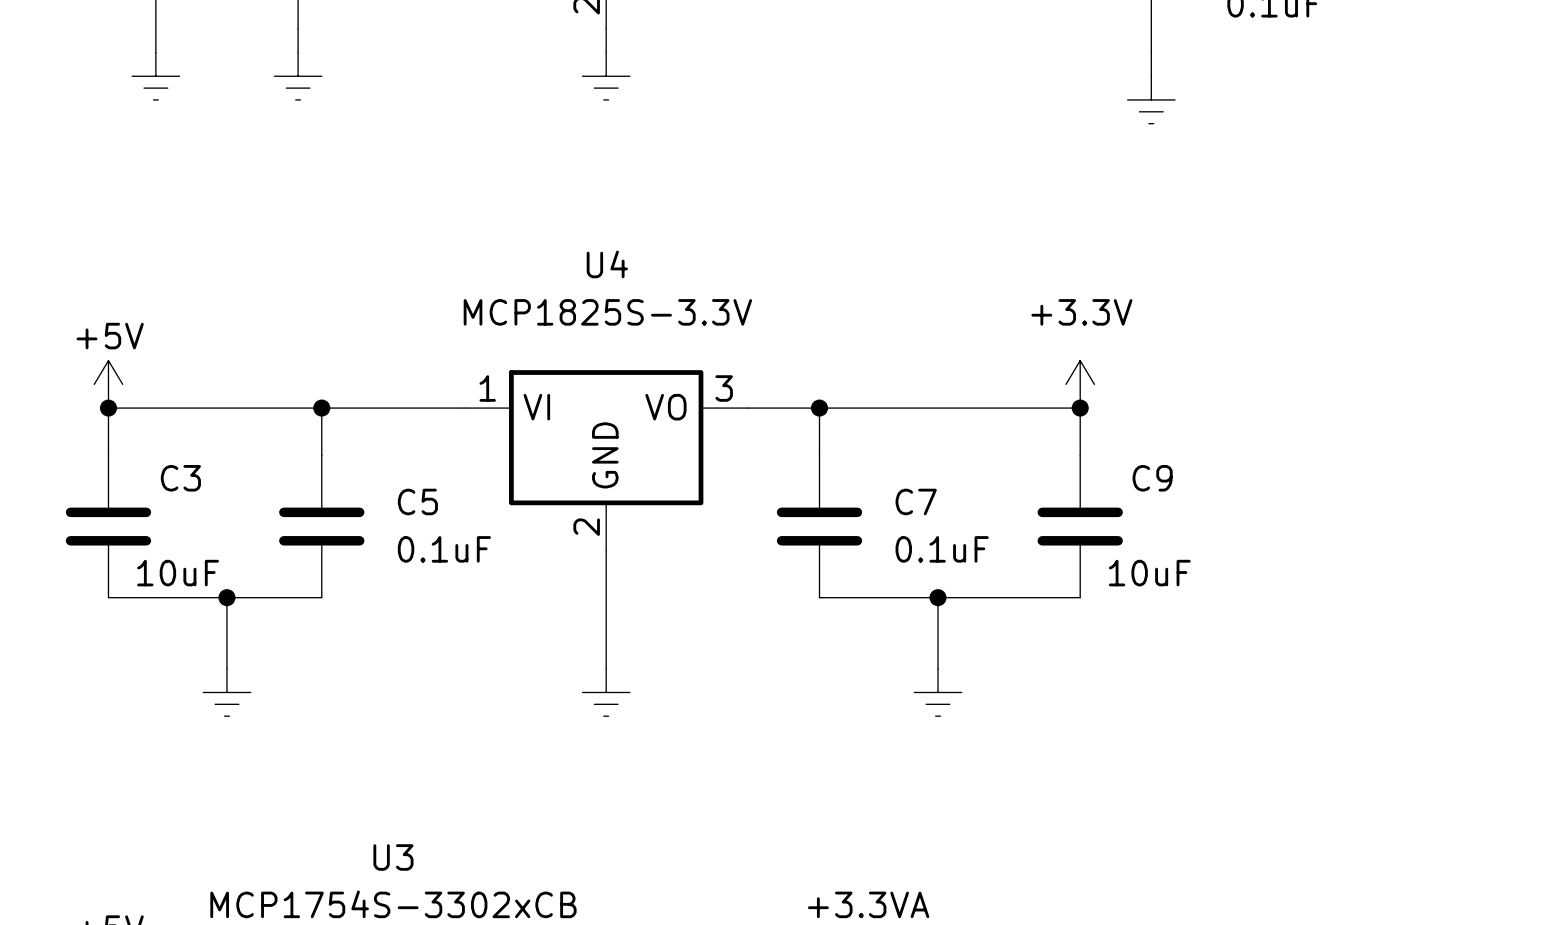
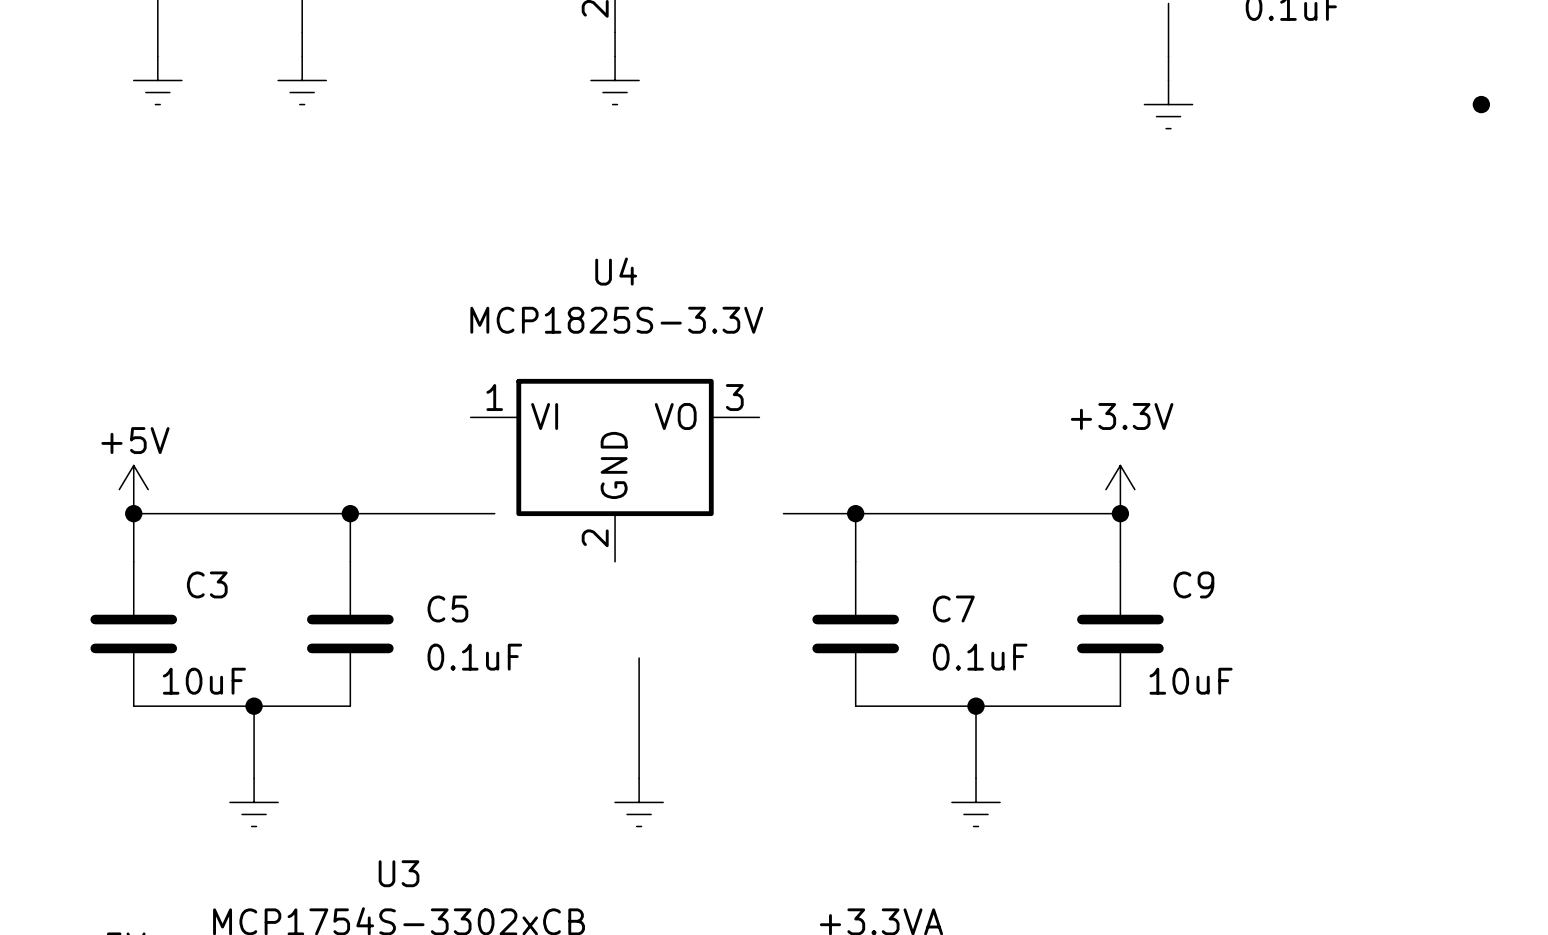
junction: none -> (1481, 104)
power symbol position: +5V (108, 384) -> +5V (133, 489)
power symbol position: +3.3V (1080, 384) -> +3.3V (1120, 489)
junction: (108, 408) -> none
wire: (321, 408) (321, 455) -> (350, 513) (350, 561)
junction: (321, 408) -> none
wire: (463, 408) (108, 408) (108, 455) -> (494, 513) (133, 513) (133, 561)
wire: (748, 408) (1080, 408) (1080, 455) -> (783, 513) (1120, 513) (1120, 561)
wire: (819, 408) (819, 455) -> (855, 513) (855, 561)
junction: (819, 408) -> none
junction: (1080, 408) -> none
junction: none -> (133, 513)
junction: none -> (350, 513)
junction: none -> (855, 513)
junction: none -> (1120, 513)
C3 position: (108, 526) -> (133, 633)
C5 position: (321, 526) -> (350, 633)
C7 position: (819, 526) -> (855, 633)
C9 position: (1080, 526) -> (1120, 633)
wire: (606, 550) (606, 668) -> (639, 658) (639, 778)
wire: (108, 597) (321, 597) -> (133, 706) (350, 706)
wire: (226, 597) (226, 668) -> (254, 706) (254, 778)
junction: (226, 597) -> none
wire: (819, 597) (1080, 597) -> (855, 706) (1120, 706)
wire: (938, 597) (938, 668) -> (976, 706) (976, 778)
junction: (938, 597) -> none
power symbol position: (226, 692) -> (254, 802)
junction: none -> (254, 706)
power symbol position: (606, 692) -> (639, 802)
power symbol position: (938, 692) -> (976, 802)
junction: none -> (976, 706)

